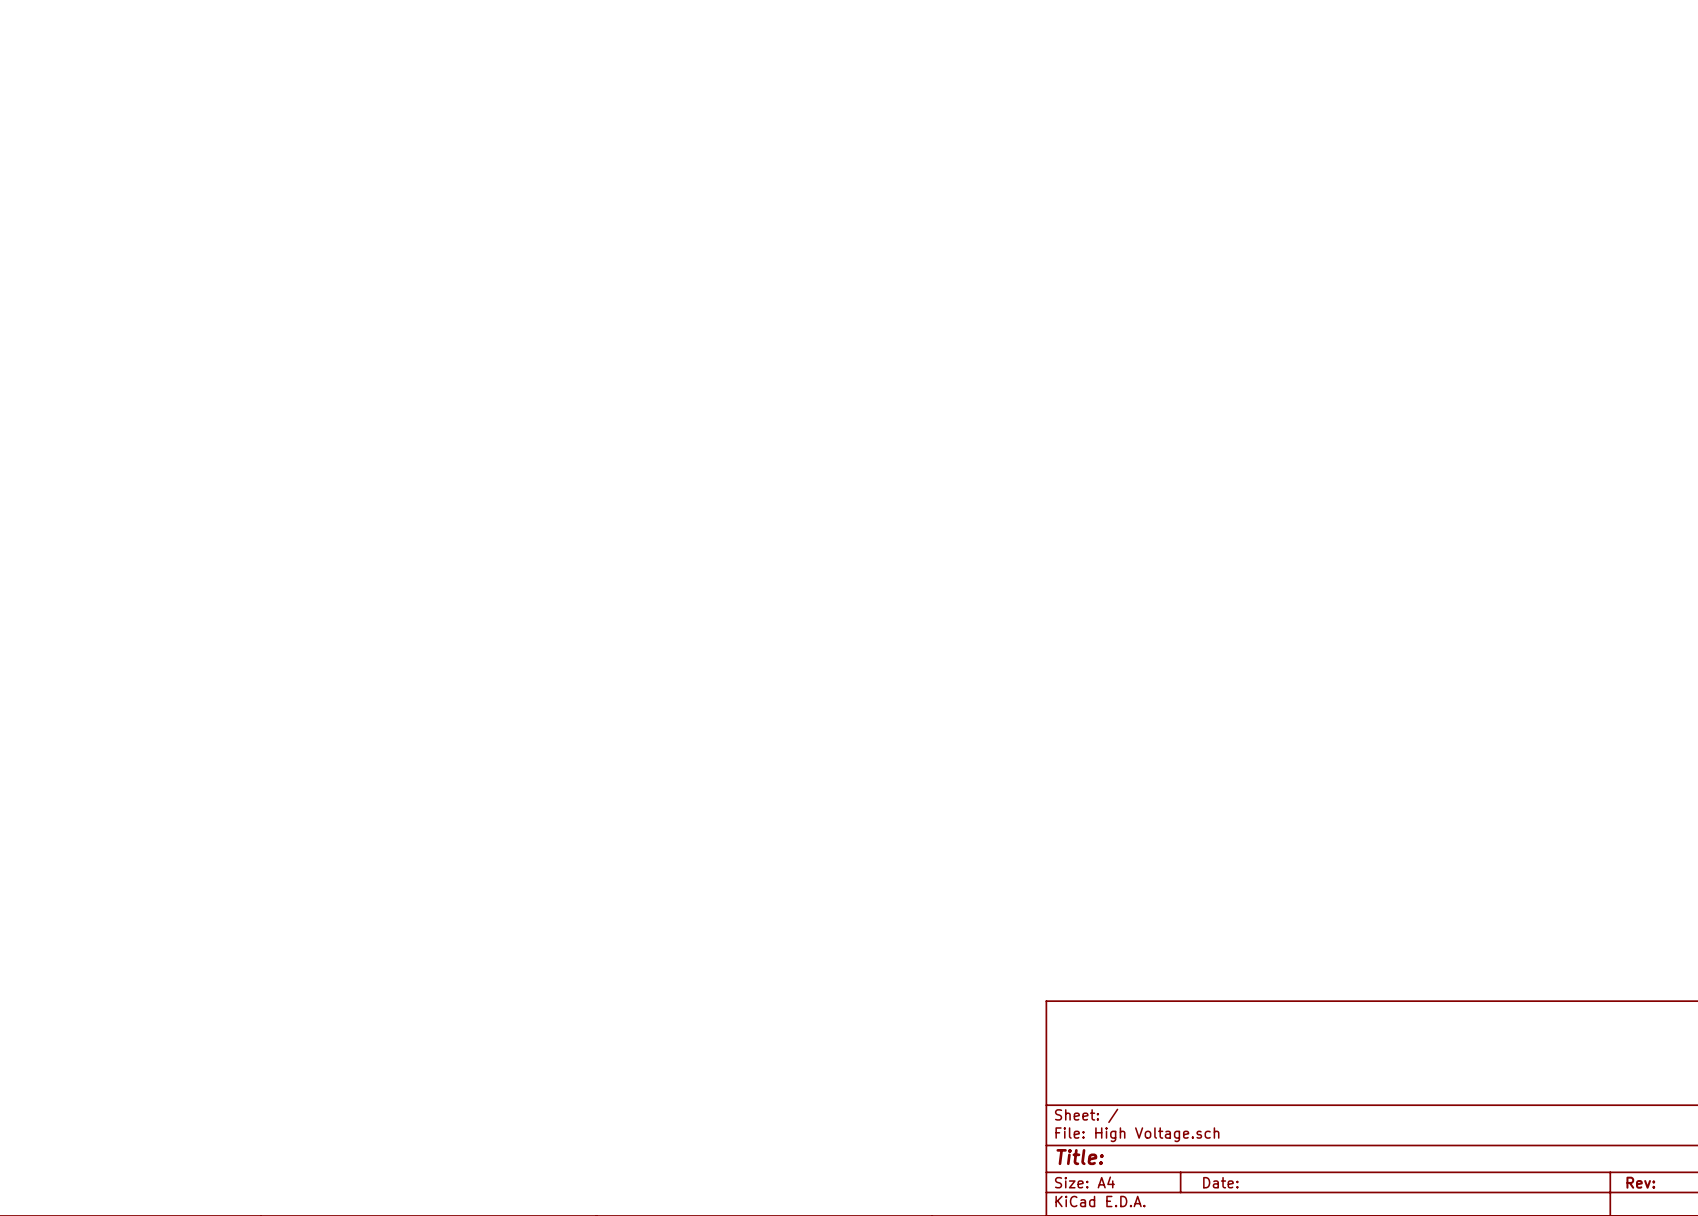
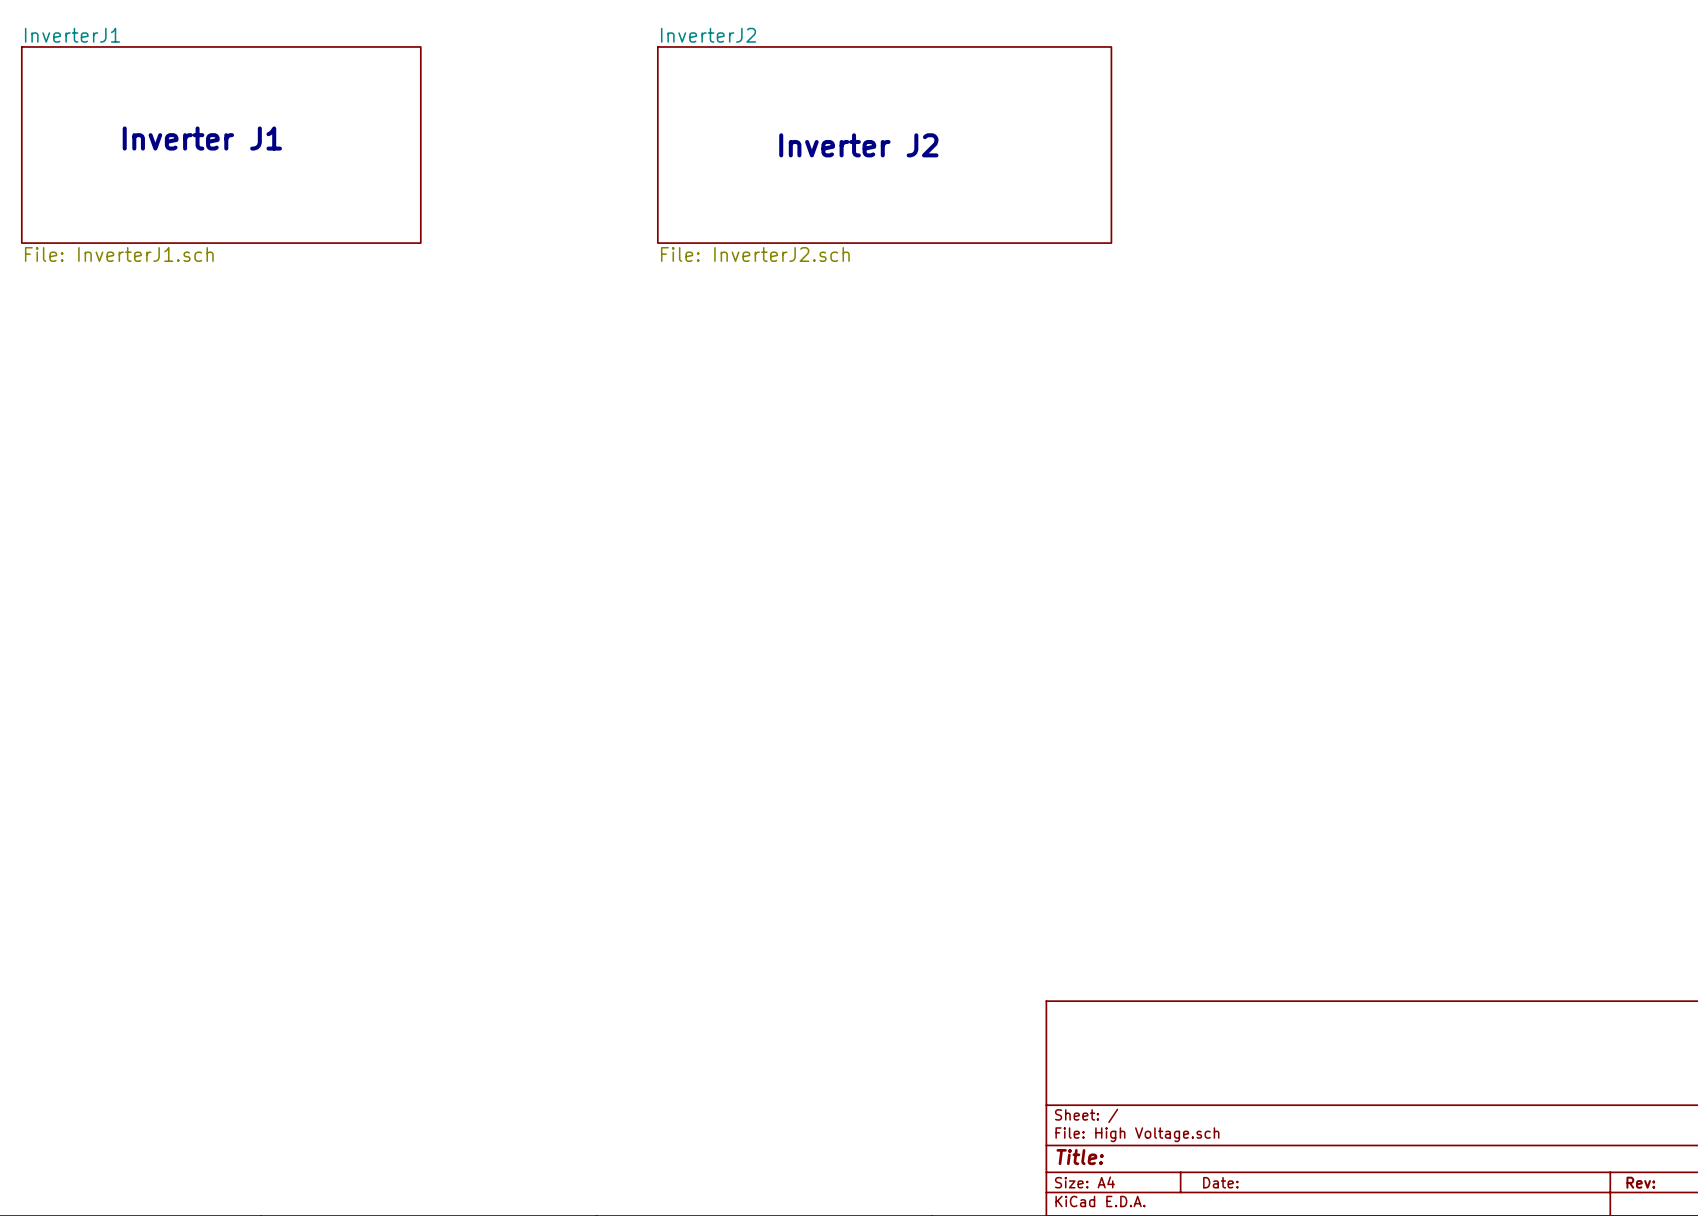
text: none -> Inverter J1 (202, 138)
sheet InverterJ1: none -> File: InverterJ1.sch (221, 145)
text: none -> Inverter J2 (858, 145)
sheet InverterJ2: none -> File: InverterJ2.sch (884, 145)

